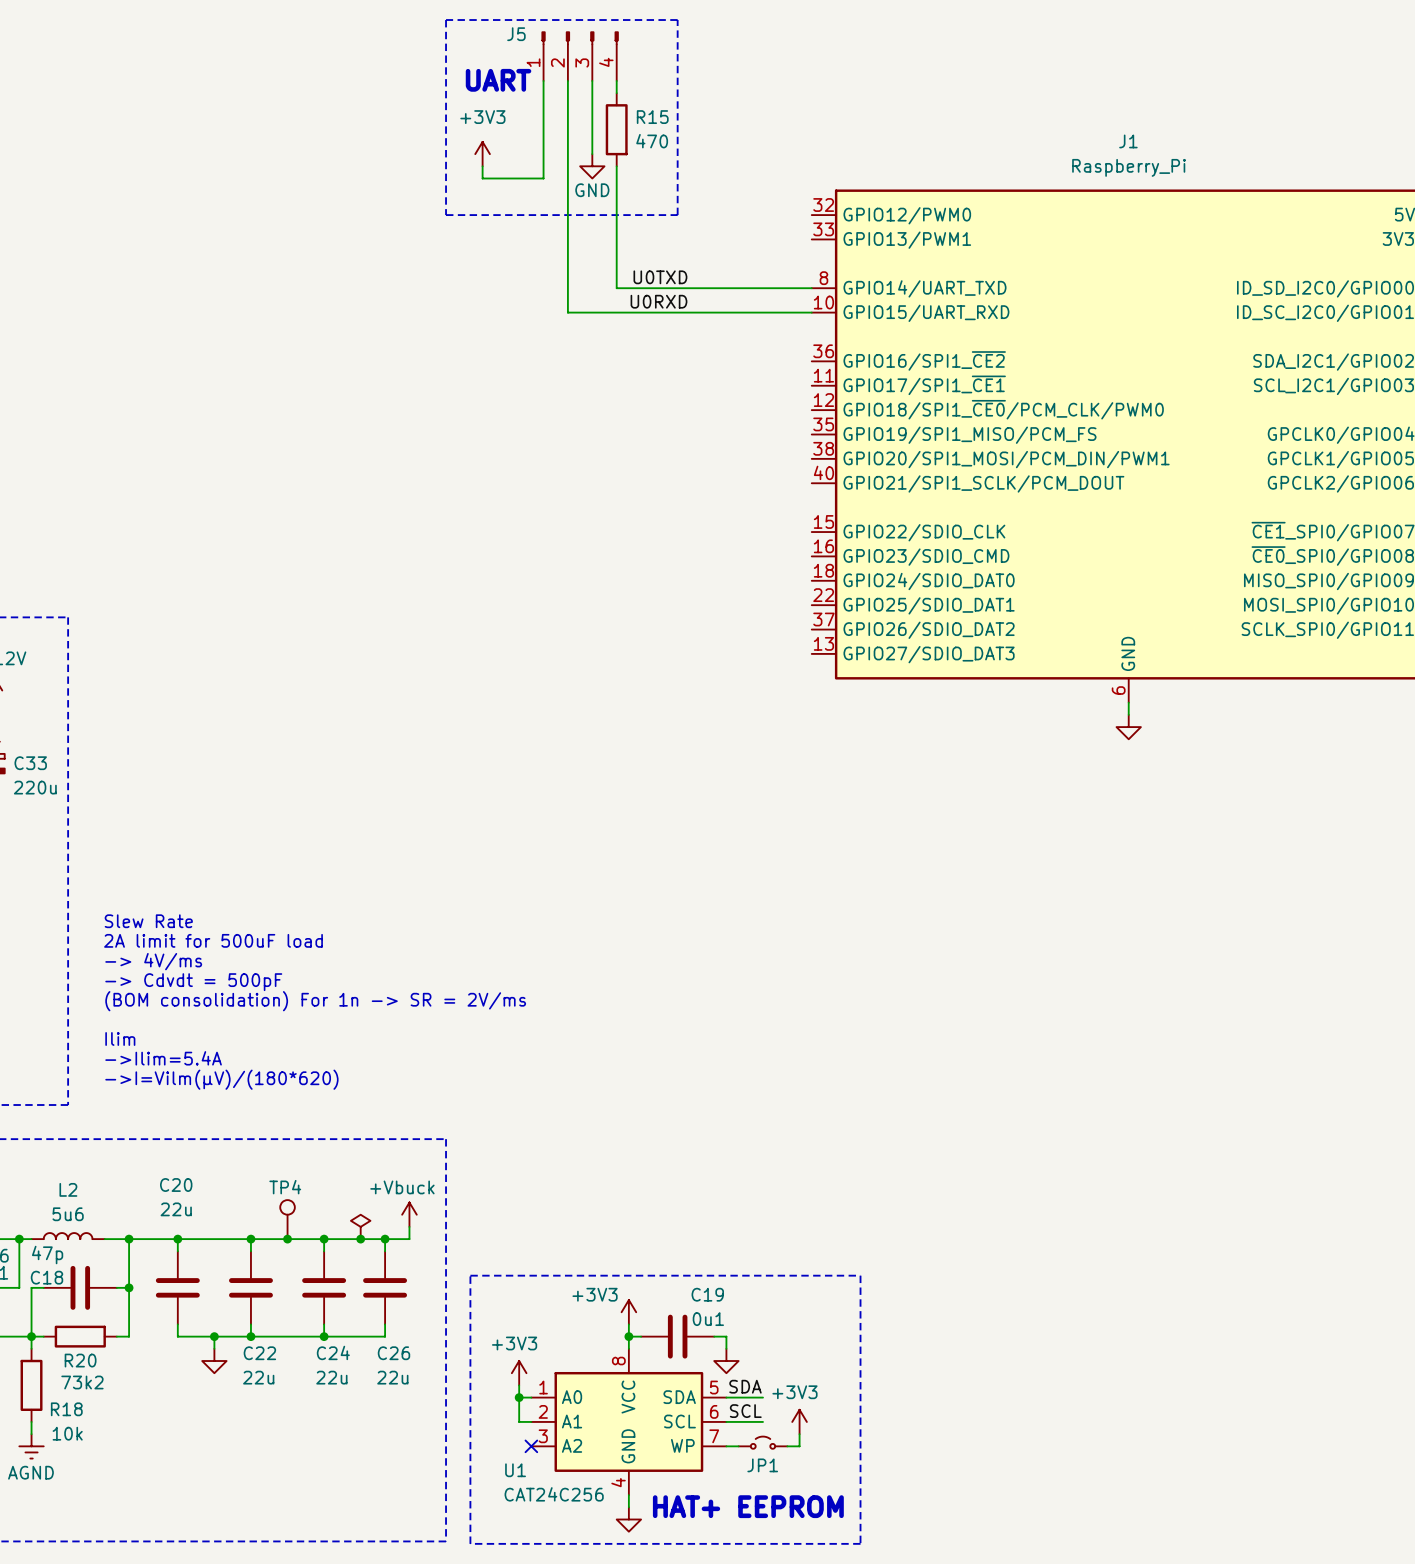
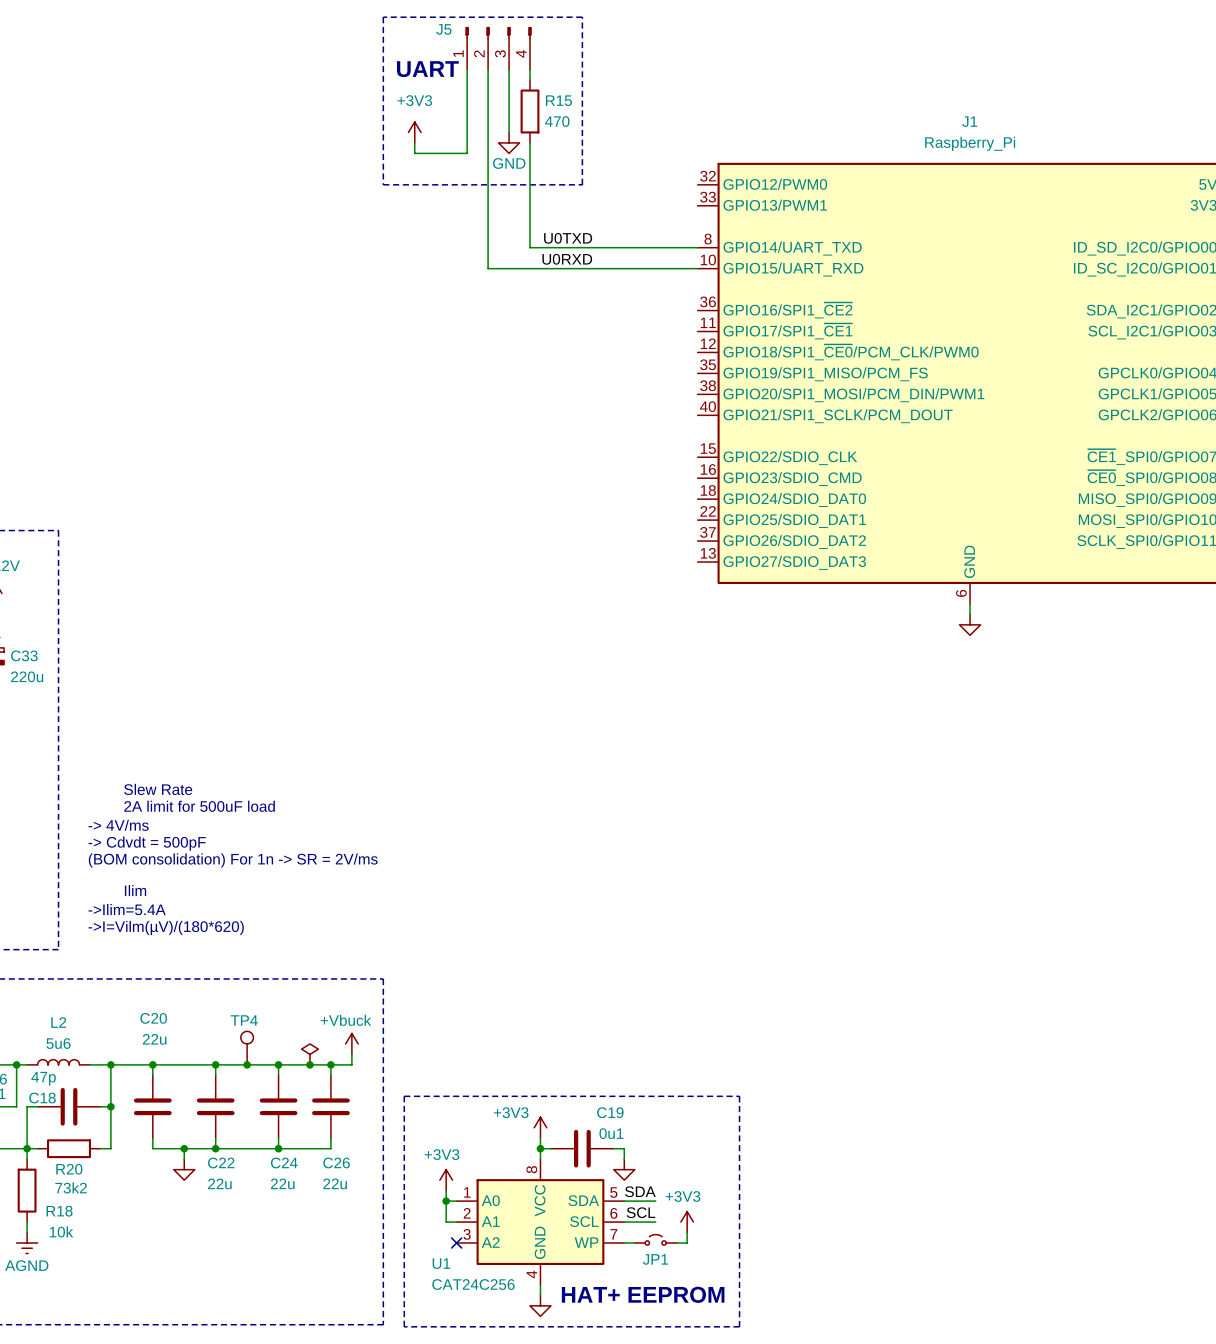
text position: Slew Rate (148, 921) -> Slew Rate (158, 789)
text position: 2A limit for 500uF load (213, 940) -> 2A limit for 500uF load (199, 806)
text position: Ilim (120, 1039) -> Ilim (135, 890)

